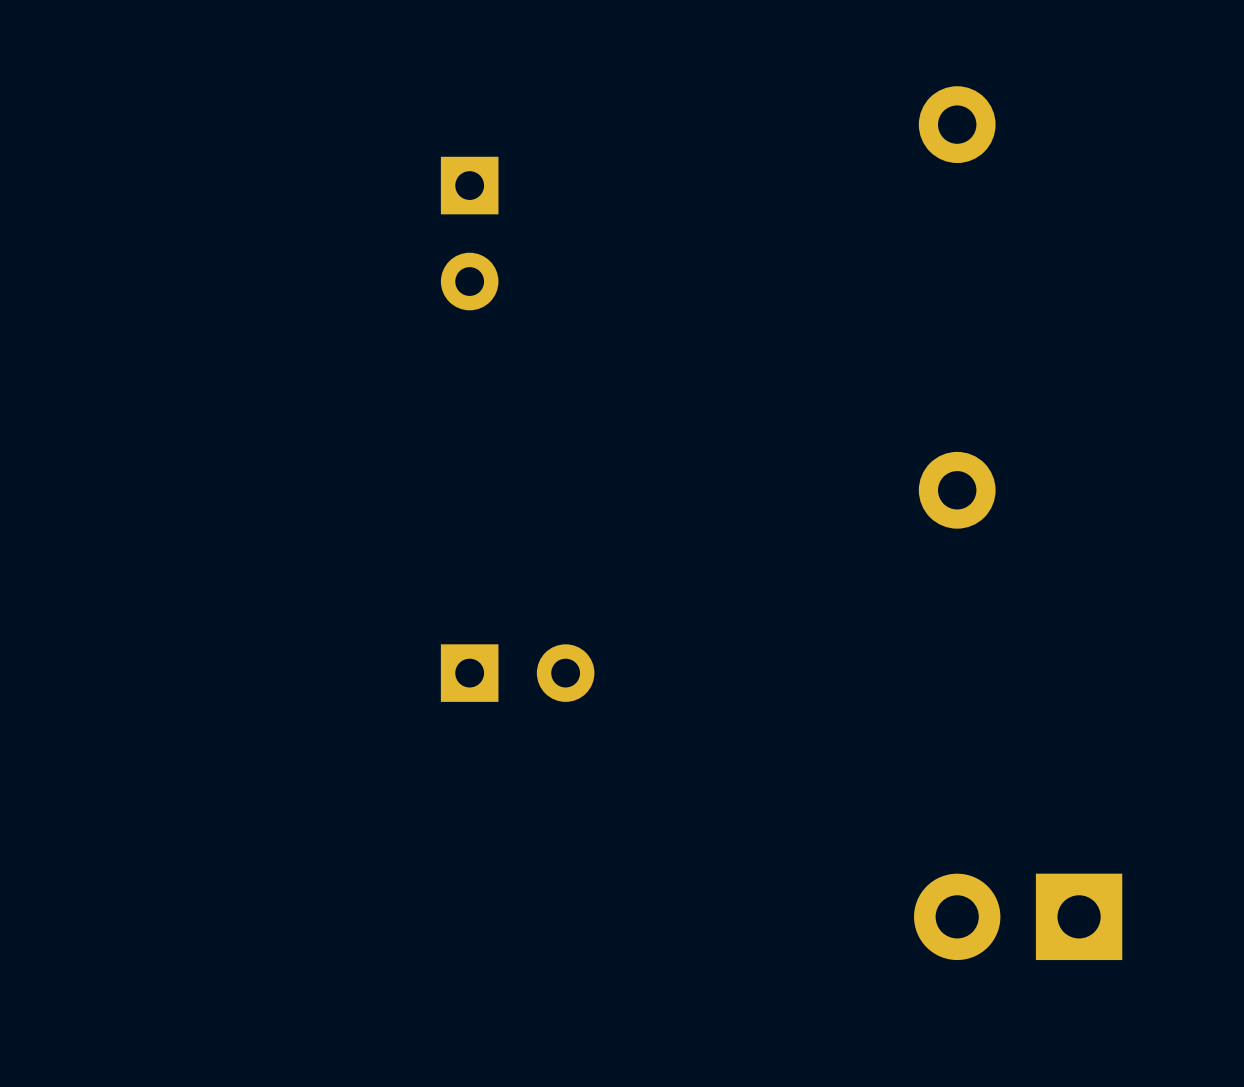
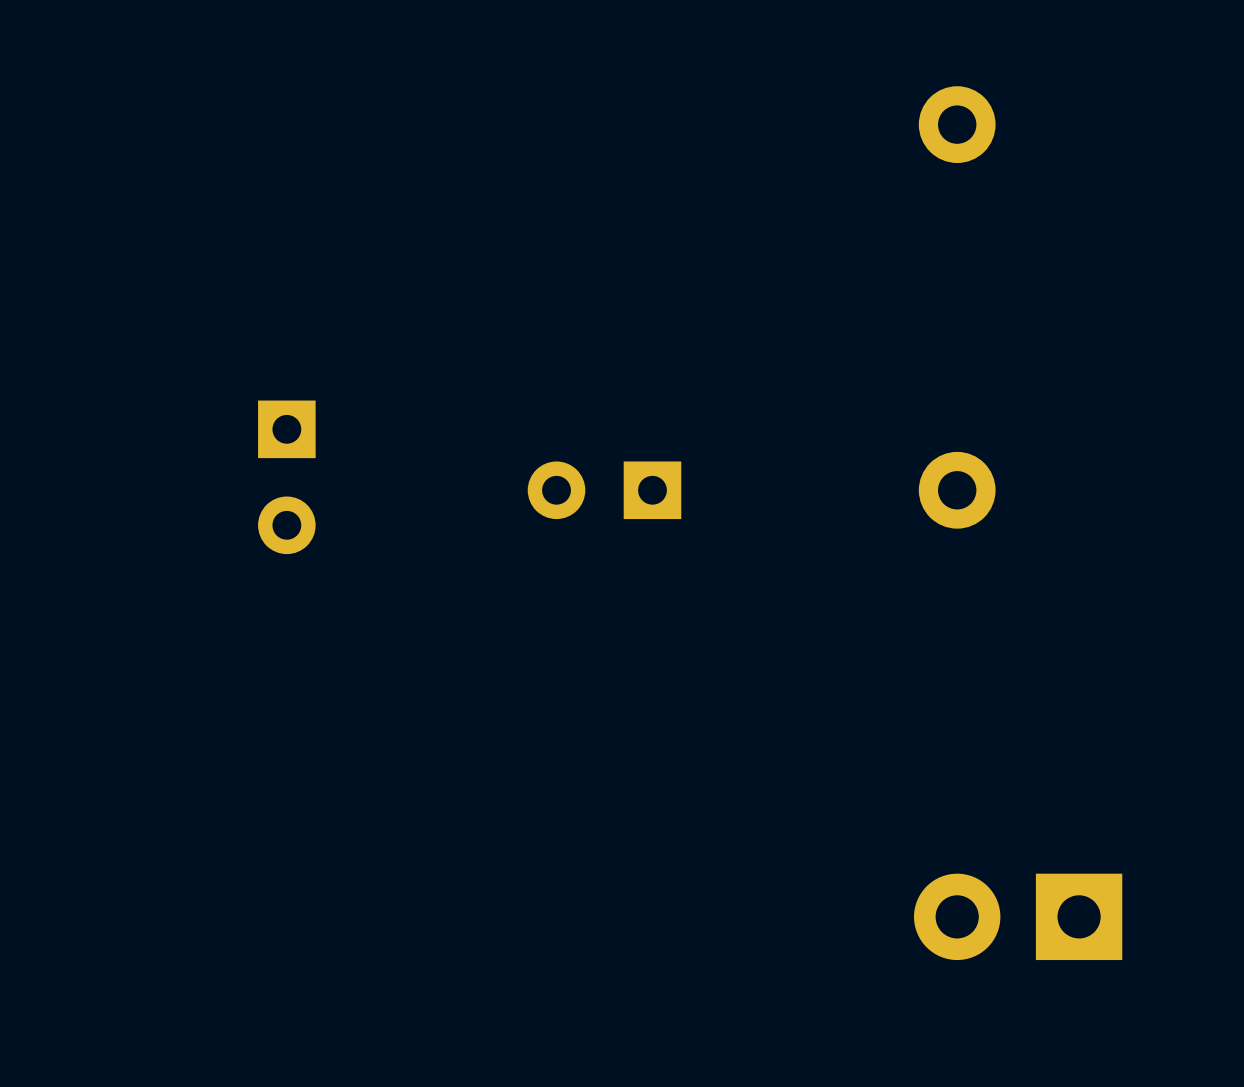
part: (469, 233) -> none
part: none -> (286, 477)
part: none -> (604, 490)
part: (517, 673) -> none

